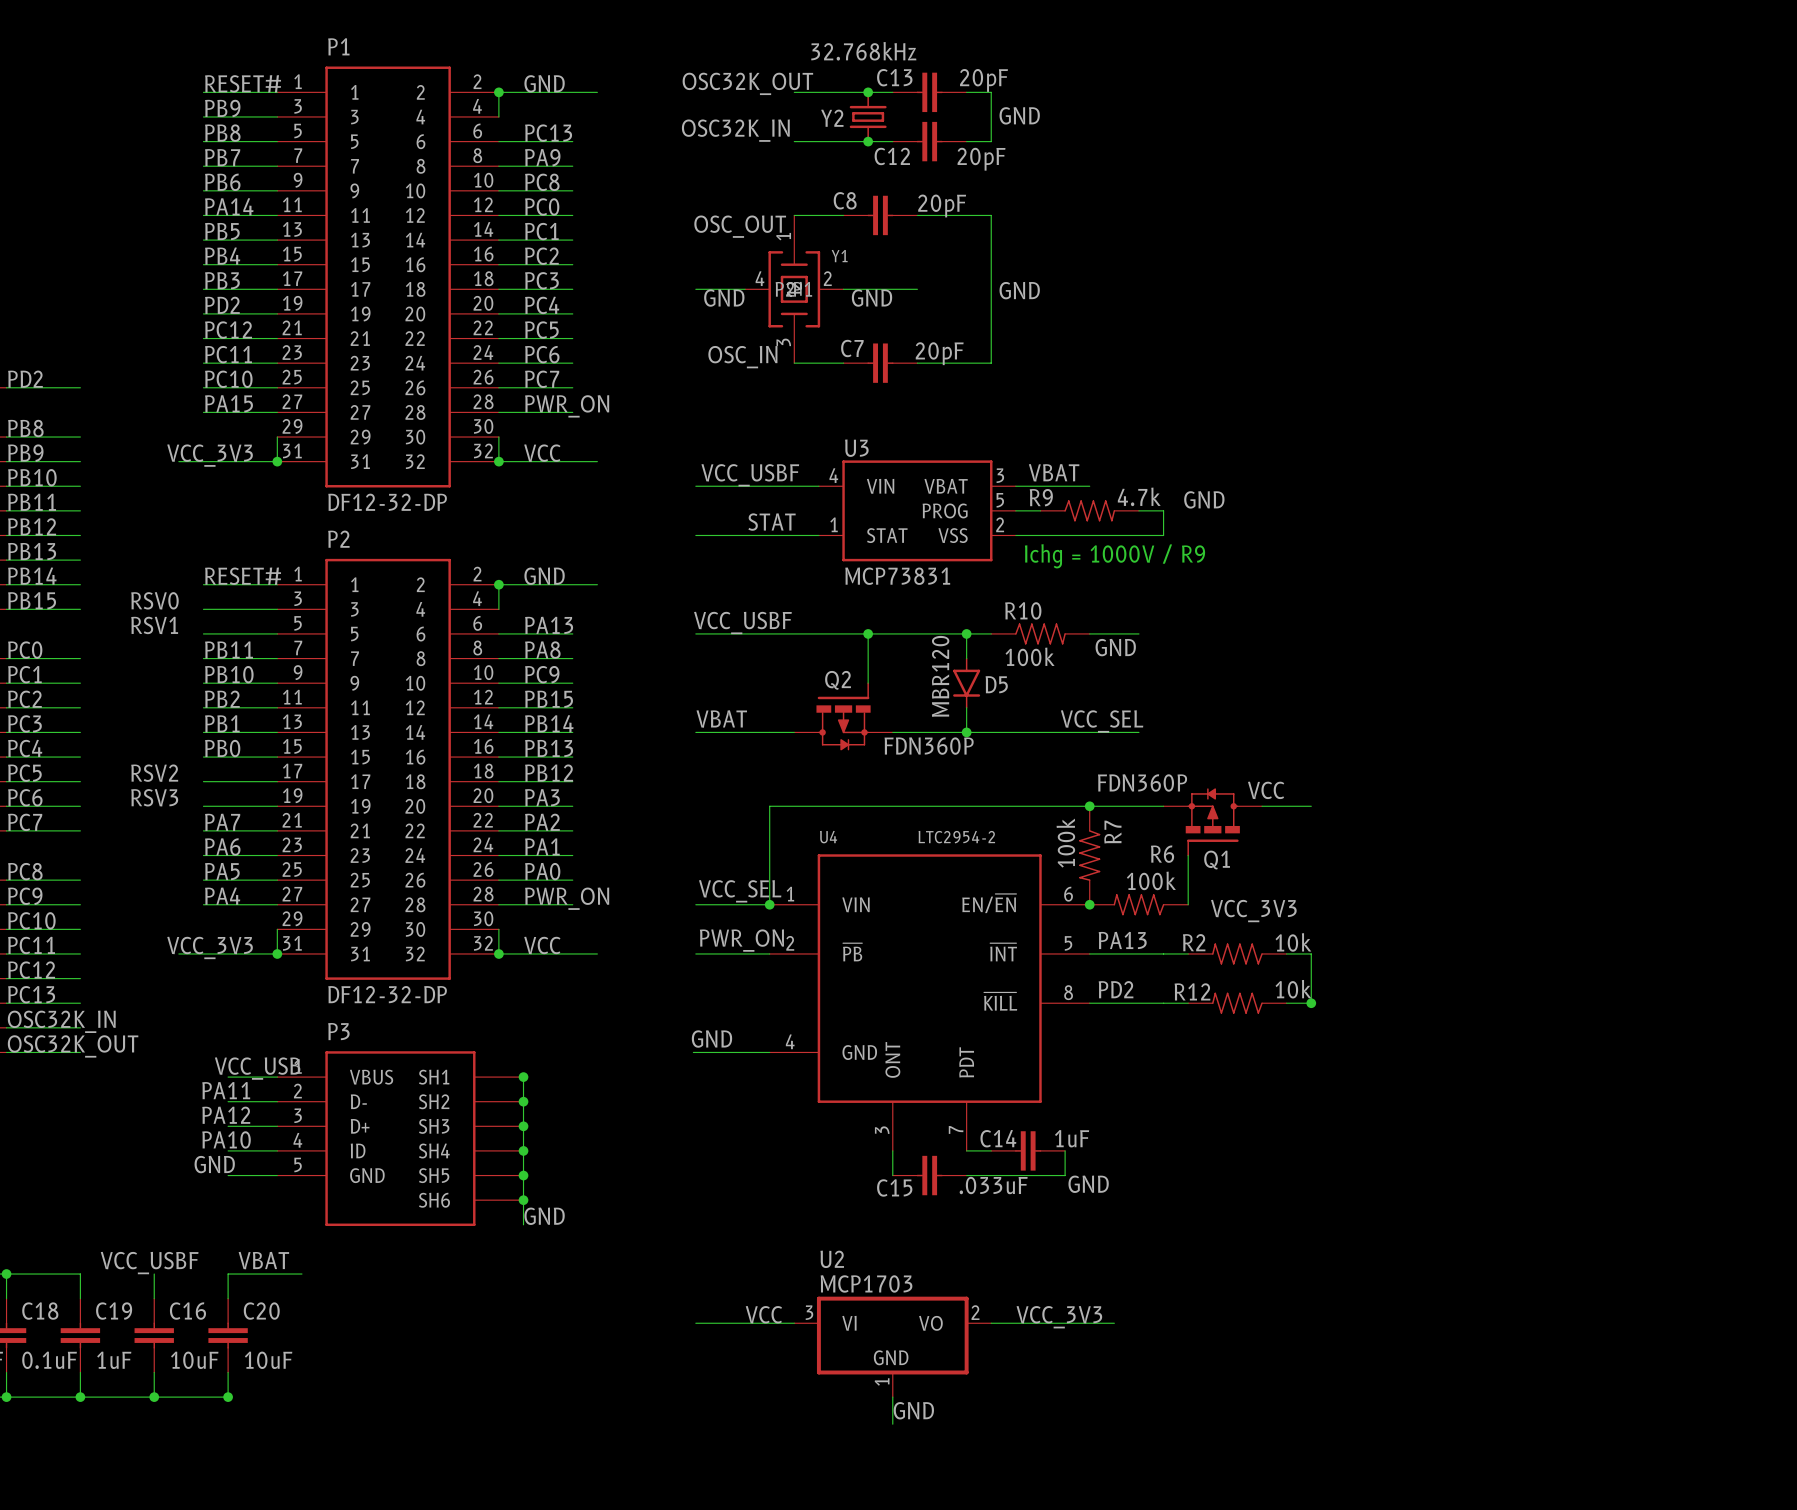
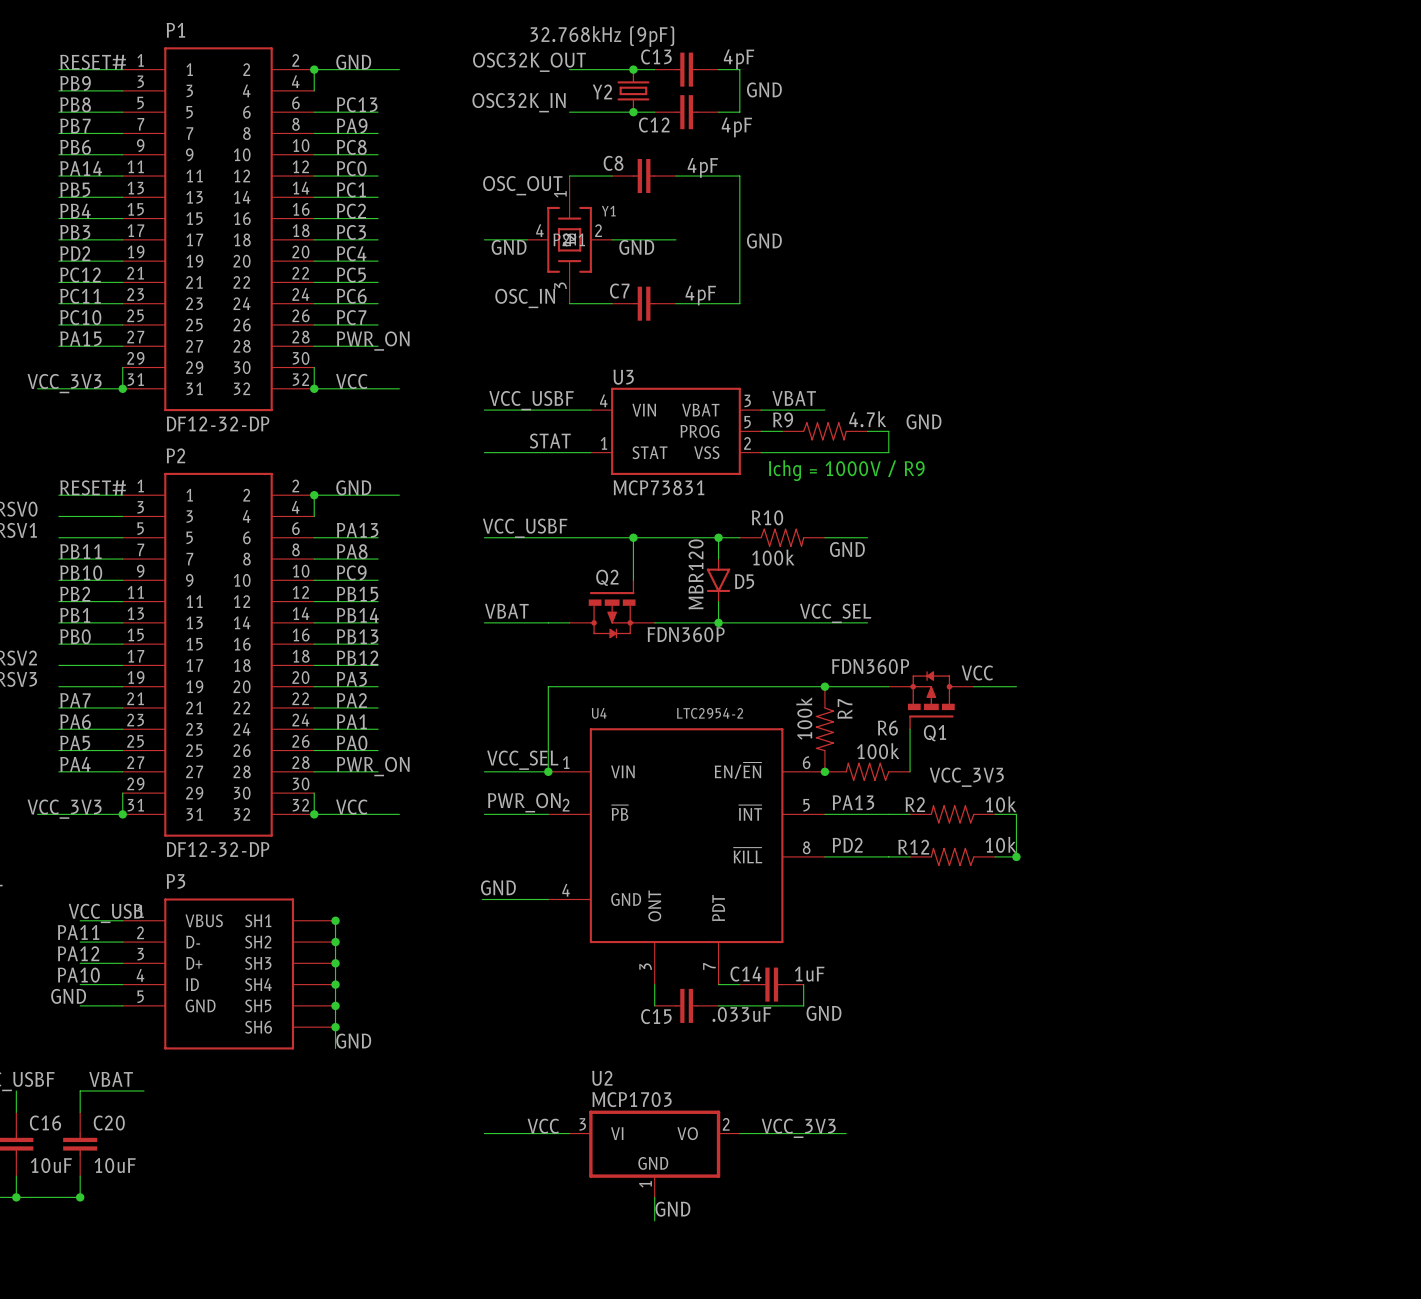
Y2 value: 32.768kHz (863, 51) -> 32.768kHz (9pF) (602, 36)
C13 value: 20pF (983, 80) -> 4pF (739, 59)
C12 value: 20pF (981, 159) -> 4pF (736, 127)
C8 value: 20pF (942, 205) -> 4pF (702, 167)
C7 value: 20pF (939, 353) -> 4pF (700, 295)

